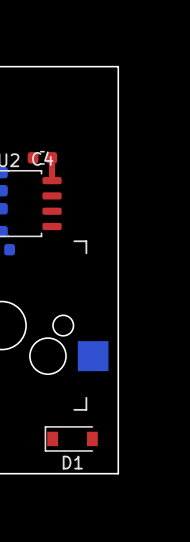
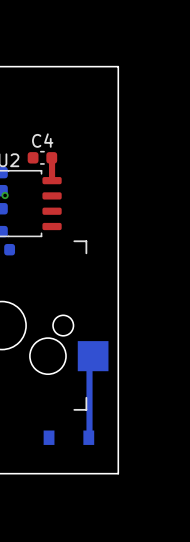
C4 name position: C4 (42, 158) -> C4 (42, 140)
via: none -> (5, 195)
bottom track: none -> (89, 354) (88, 437)
D1 side: top (71, 438) -> bottom (68, 437)

